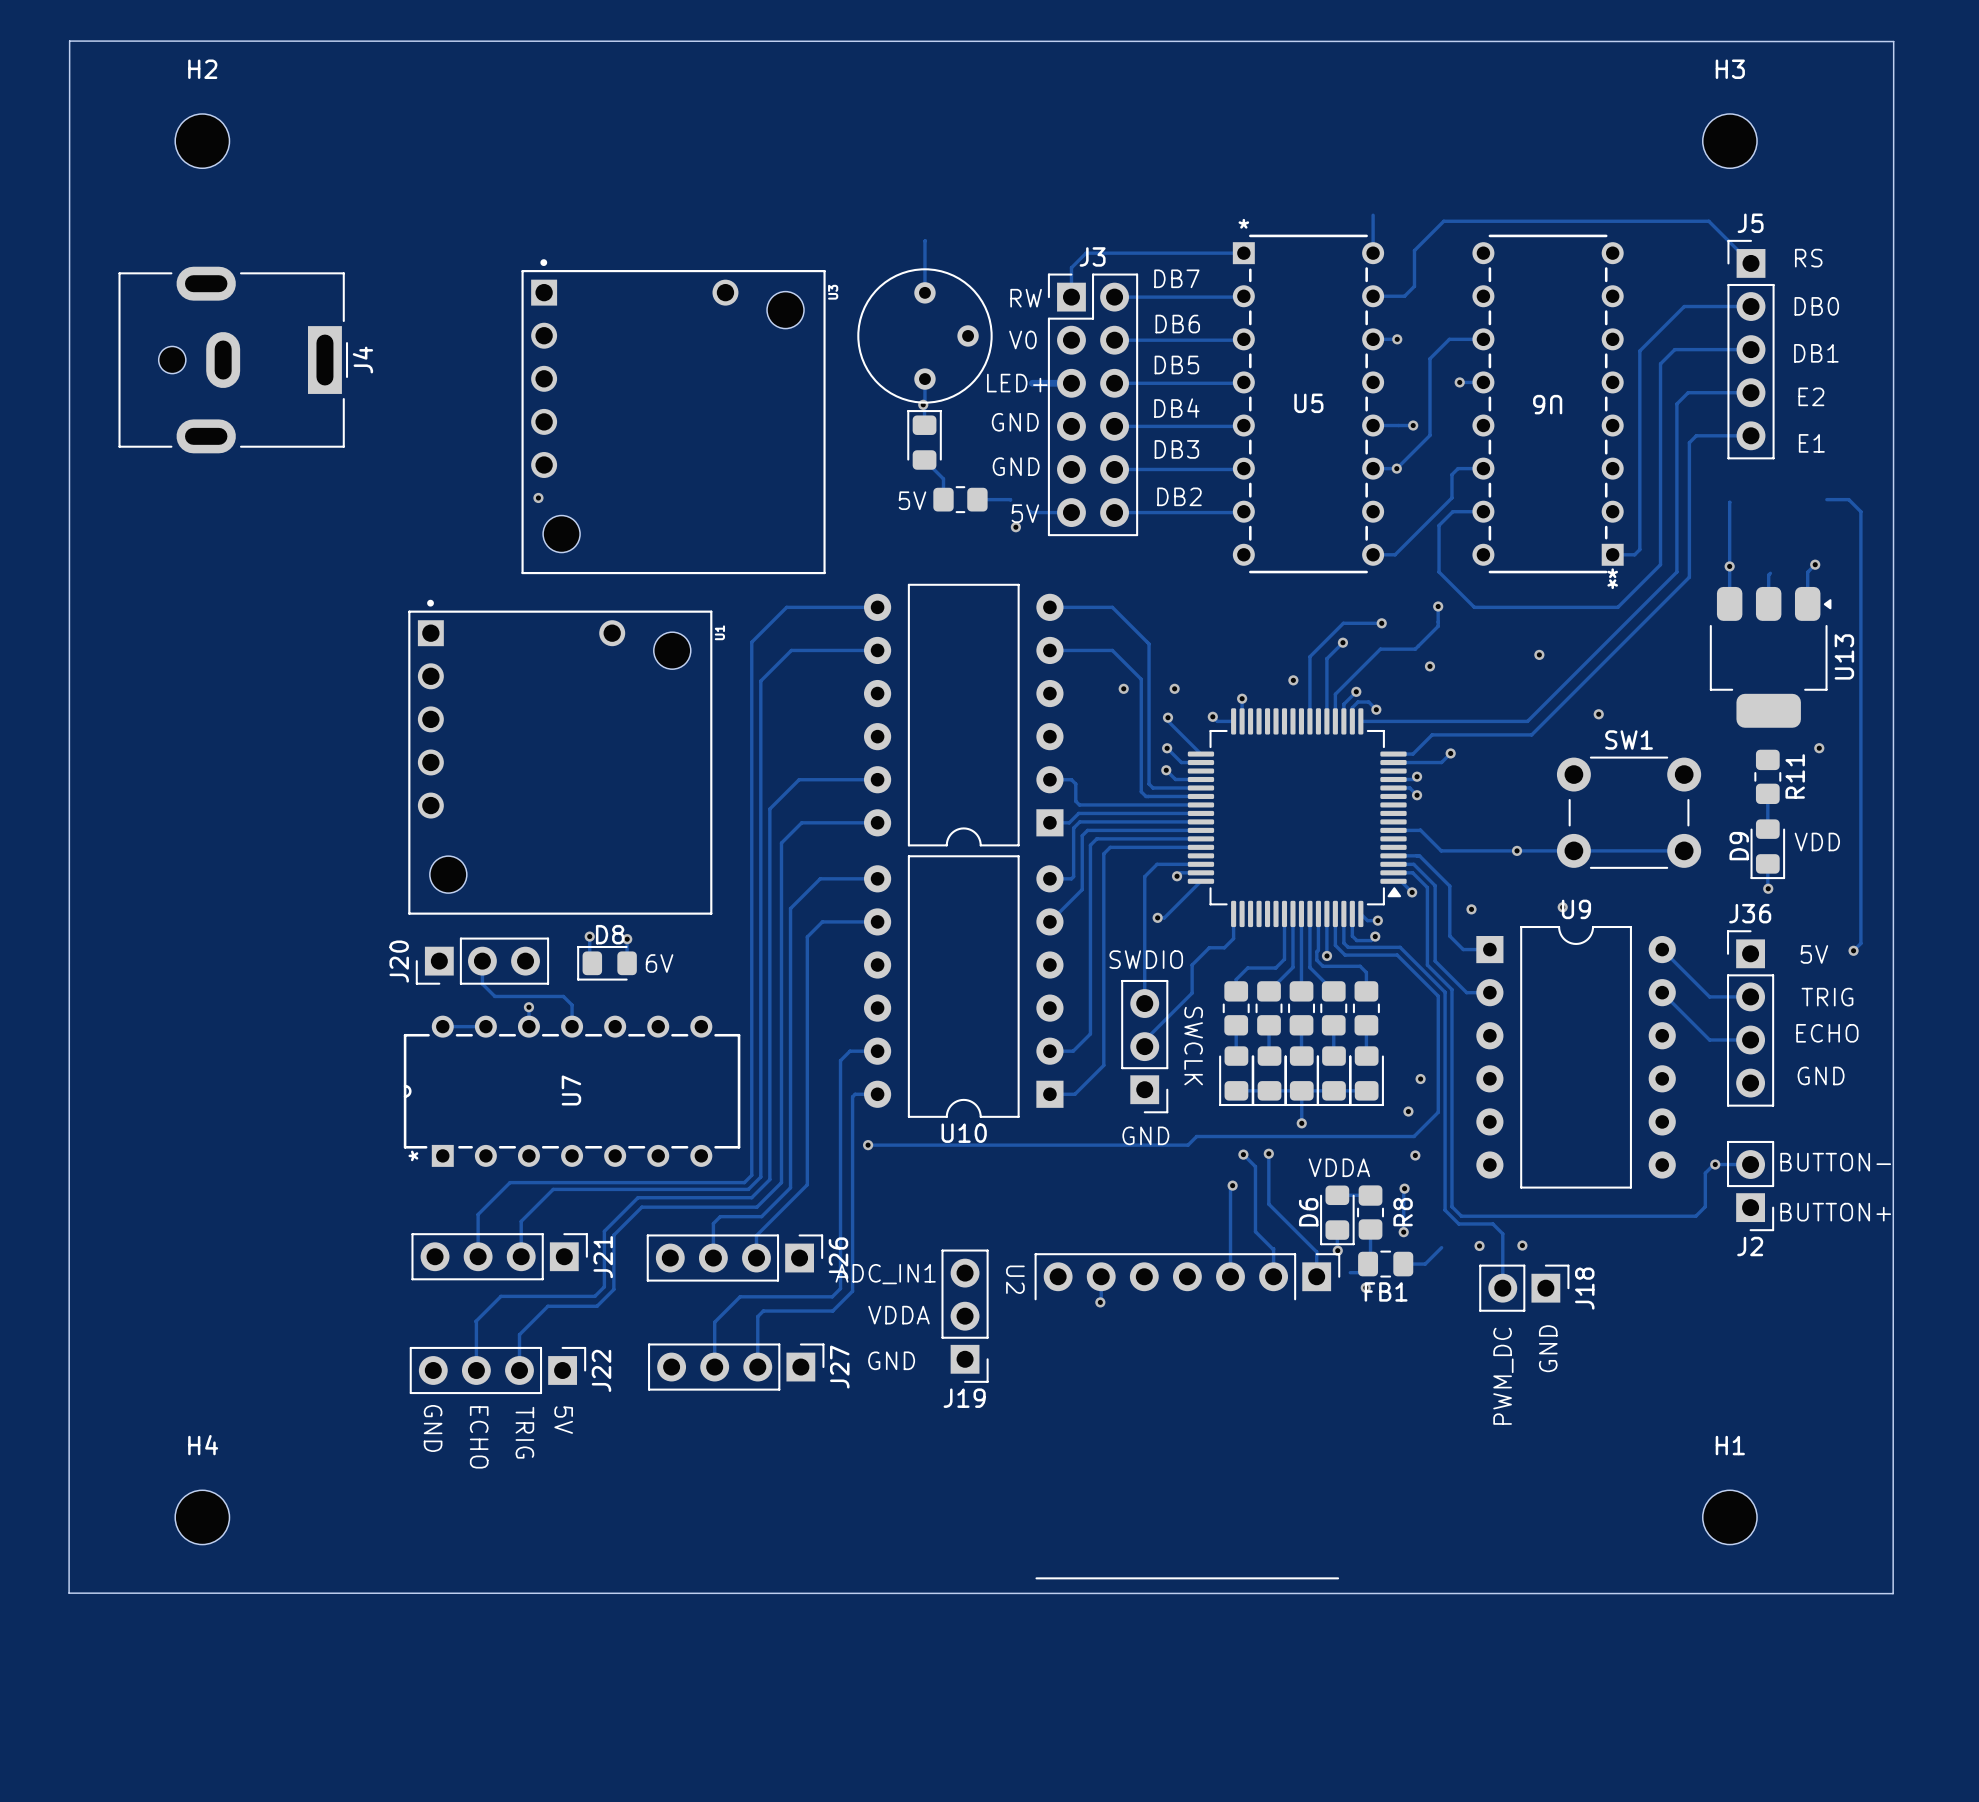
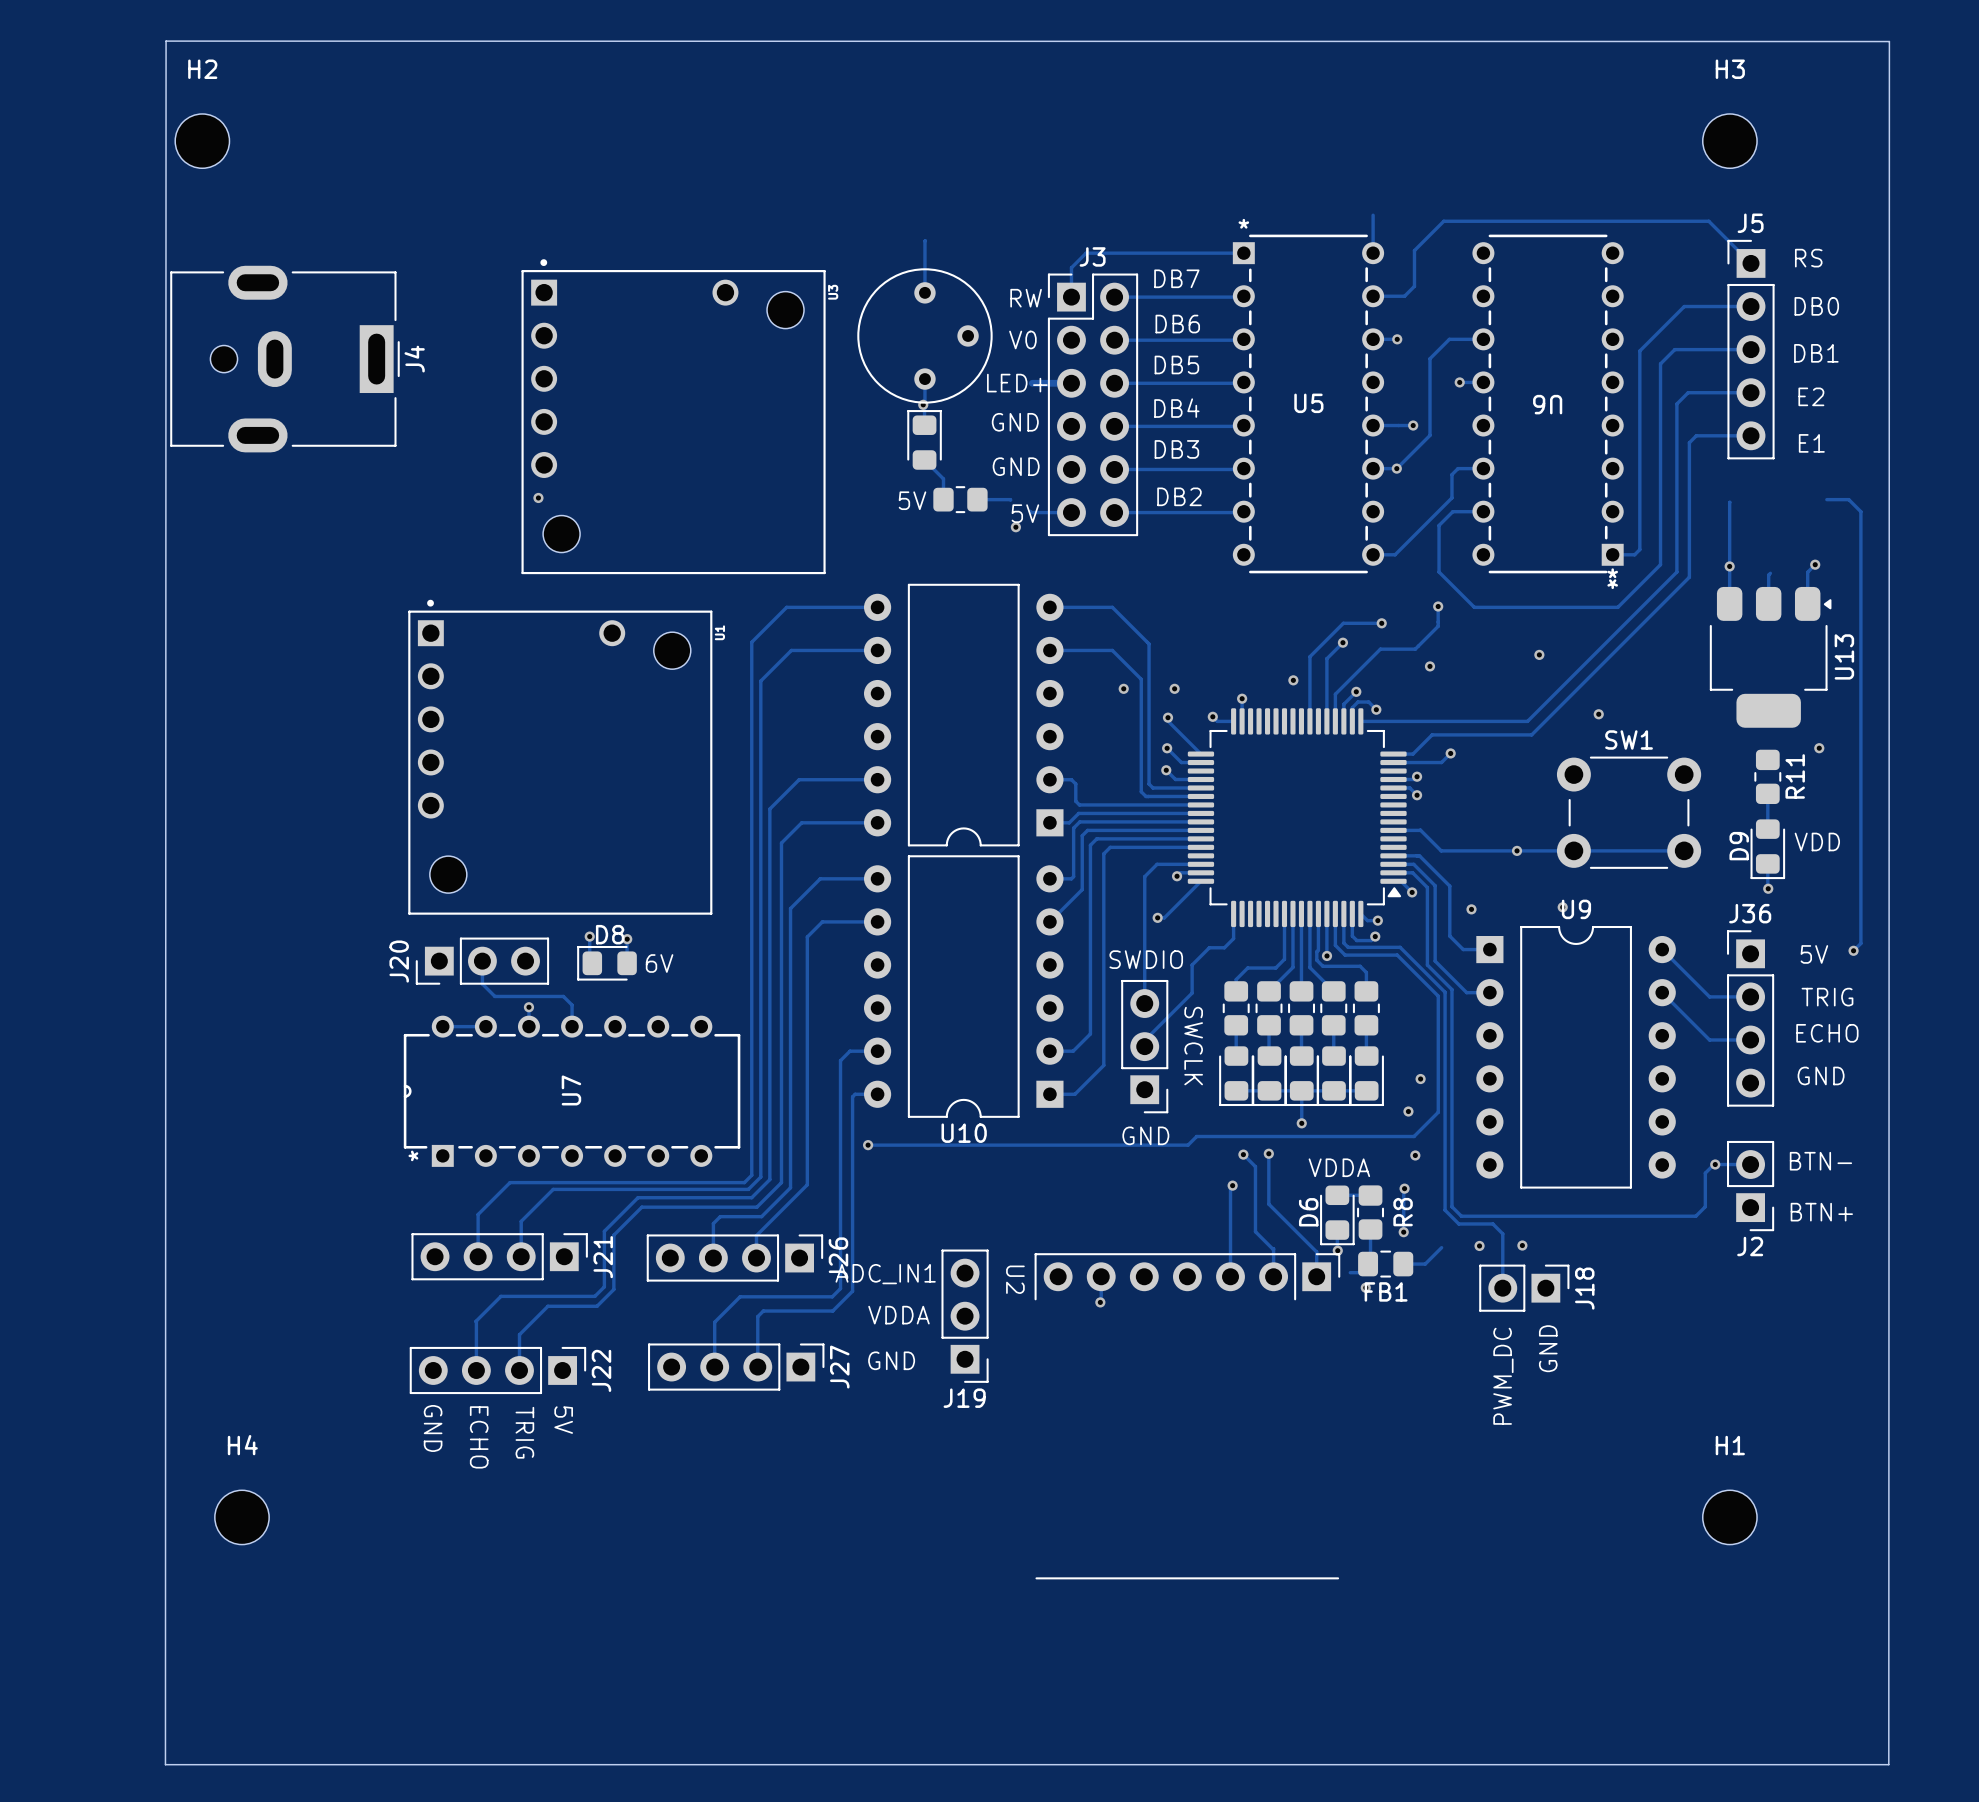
board edge: (166, 41) (69, 41) (69, 1593) (1893, 1593) (1893, 41) (1889, 41) -> (166, 41) (165, 1764) (1888, 1764) (1889, 41)
J4 position: (233, 360) -> (284, 359)
text: BUTTON- (1835, 1162) -> BTN- (1820, 1161)
text: BUTTON+ (1835, 1212) -> BTN+ (1821, 1212)
H4 position: (202, 1517) -> (241, 1517)

